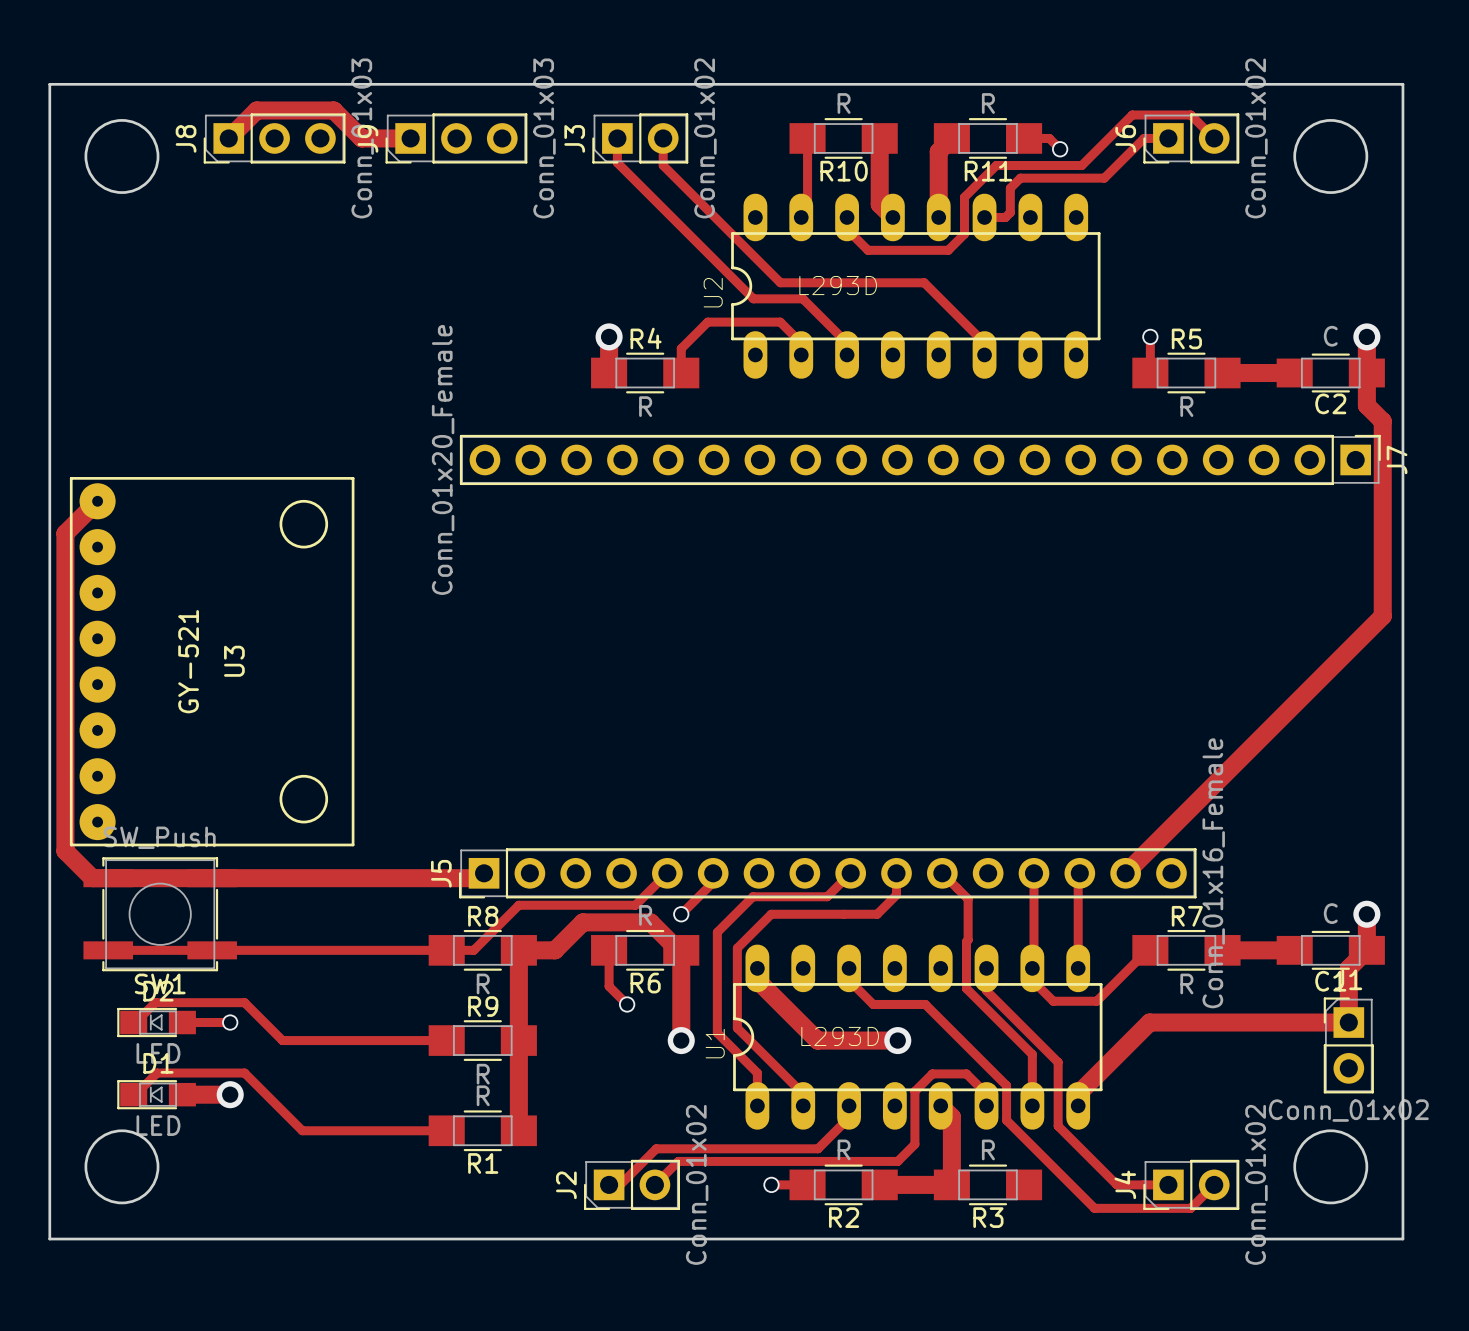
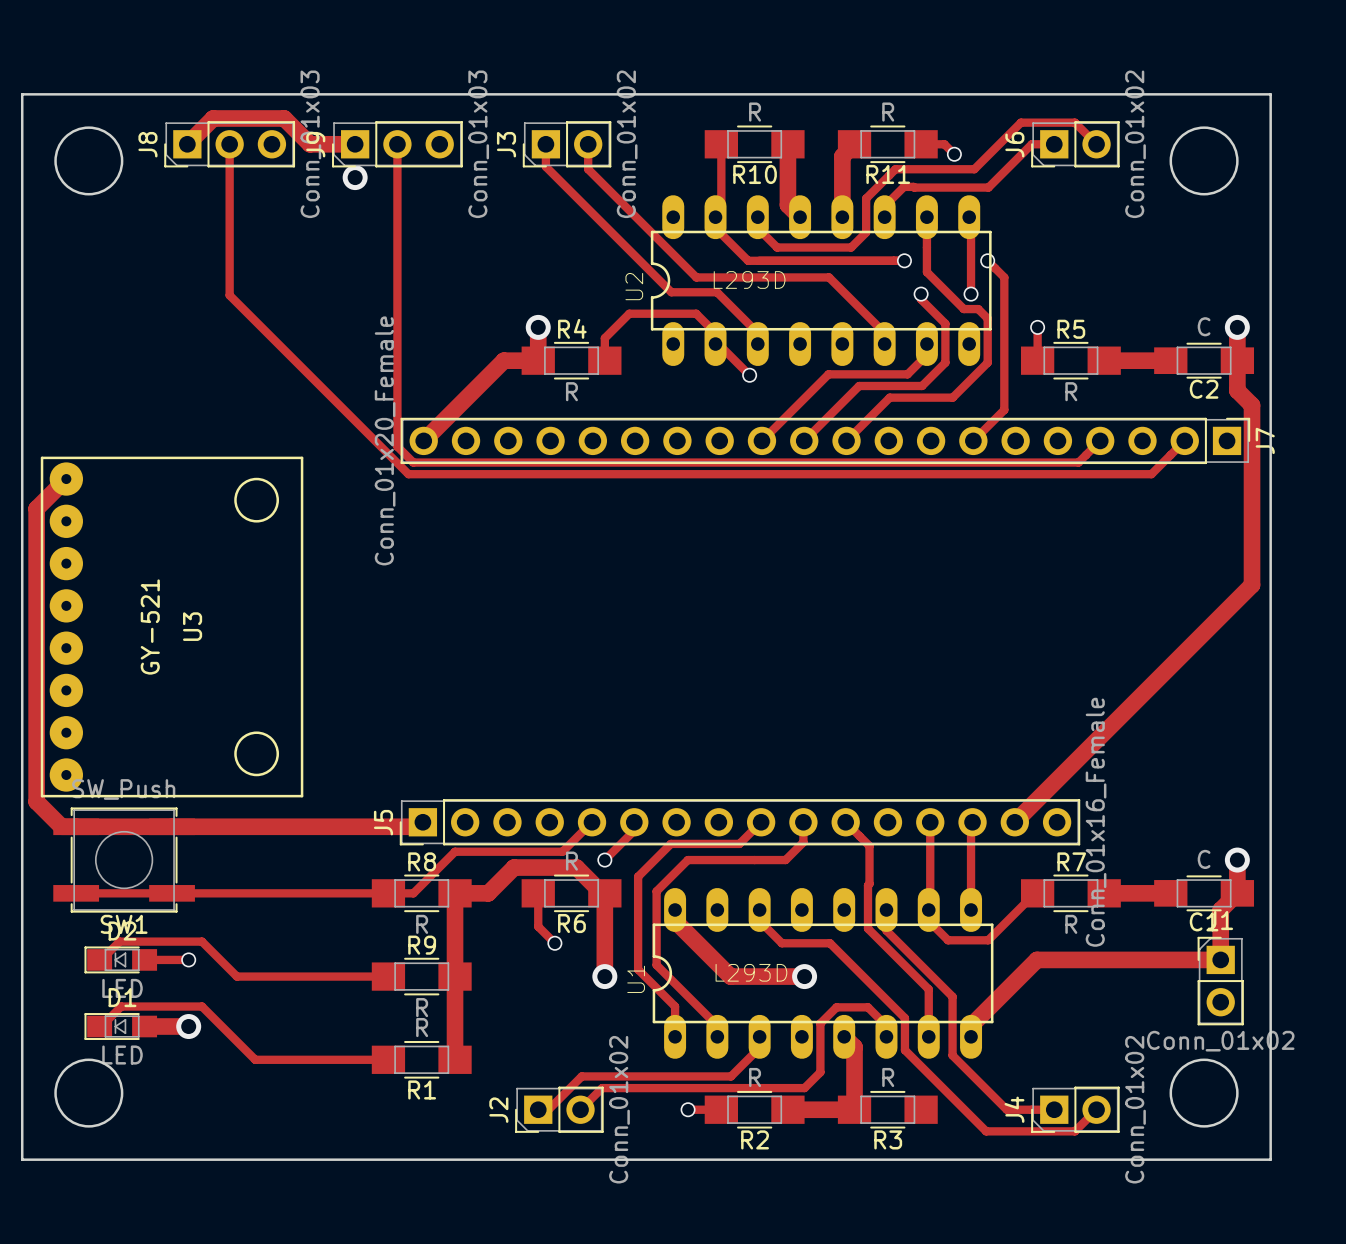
track: none -> (229, 144) (229, 295) (408, 474) (1151, 474) (1184, 440)
track: none -> (397, 144) (397, 446) (413, 462) (1078, 462) (1100, 440)
via: none -> (355, 177)
track: (1104, 178) (1020, 178) (1010, 188) (1010, 212) (1005, 217) (990, 217) -> (995, 180) (988, 187) (903, 186) (884, 206) (884, 217)
track: none -> (969, 217) (971, 219) (971, 294)
track: none -> (715, 228) (748, 260) (904, 260)
track: none -> (926, 228) (926, 272) (963, 309) (978, 309) (987, 318) (987, 362) (952, 397) (889, 397) (846, 440)
via: none -> (904, 260)
track: none -> (987, 260) (1004, 277) (1004, 409) (973, 440)
via: none -> (987, 260)
track: none -> (921, 294) (921, 299) (945, 323) (945, 362) (922, 386) (859, 386) (804, 440)
via: none -> (921, 294)
via: none -> (971, 294)
track: none -> (715, 344) (718, 344) (749, 375)
track: none -> (926, 344) (926, 355) (907, 374) (828, 374) (761, 440)
track: none -> (538, 360) (503, 360) (423, 440)
via: none -> (749, 375)

